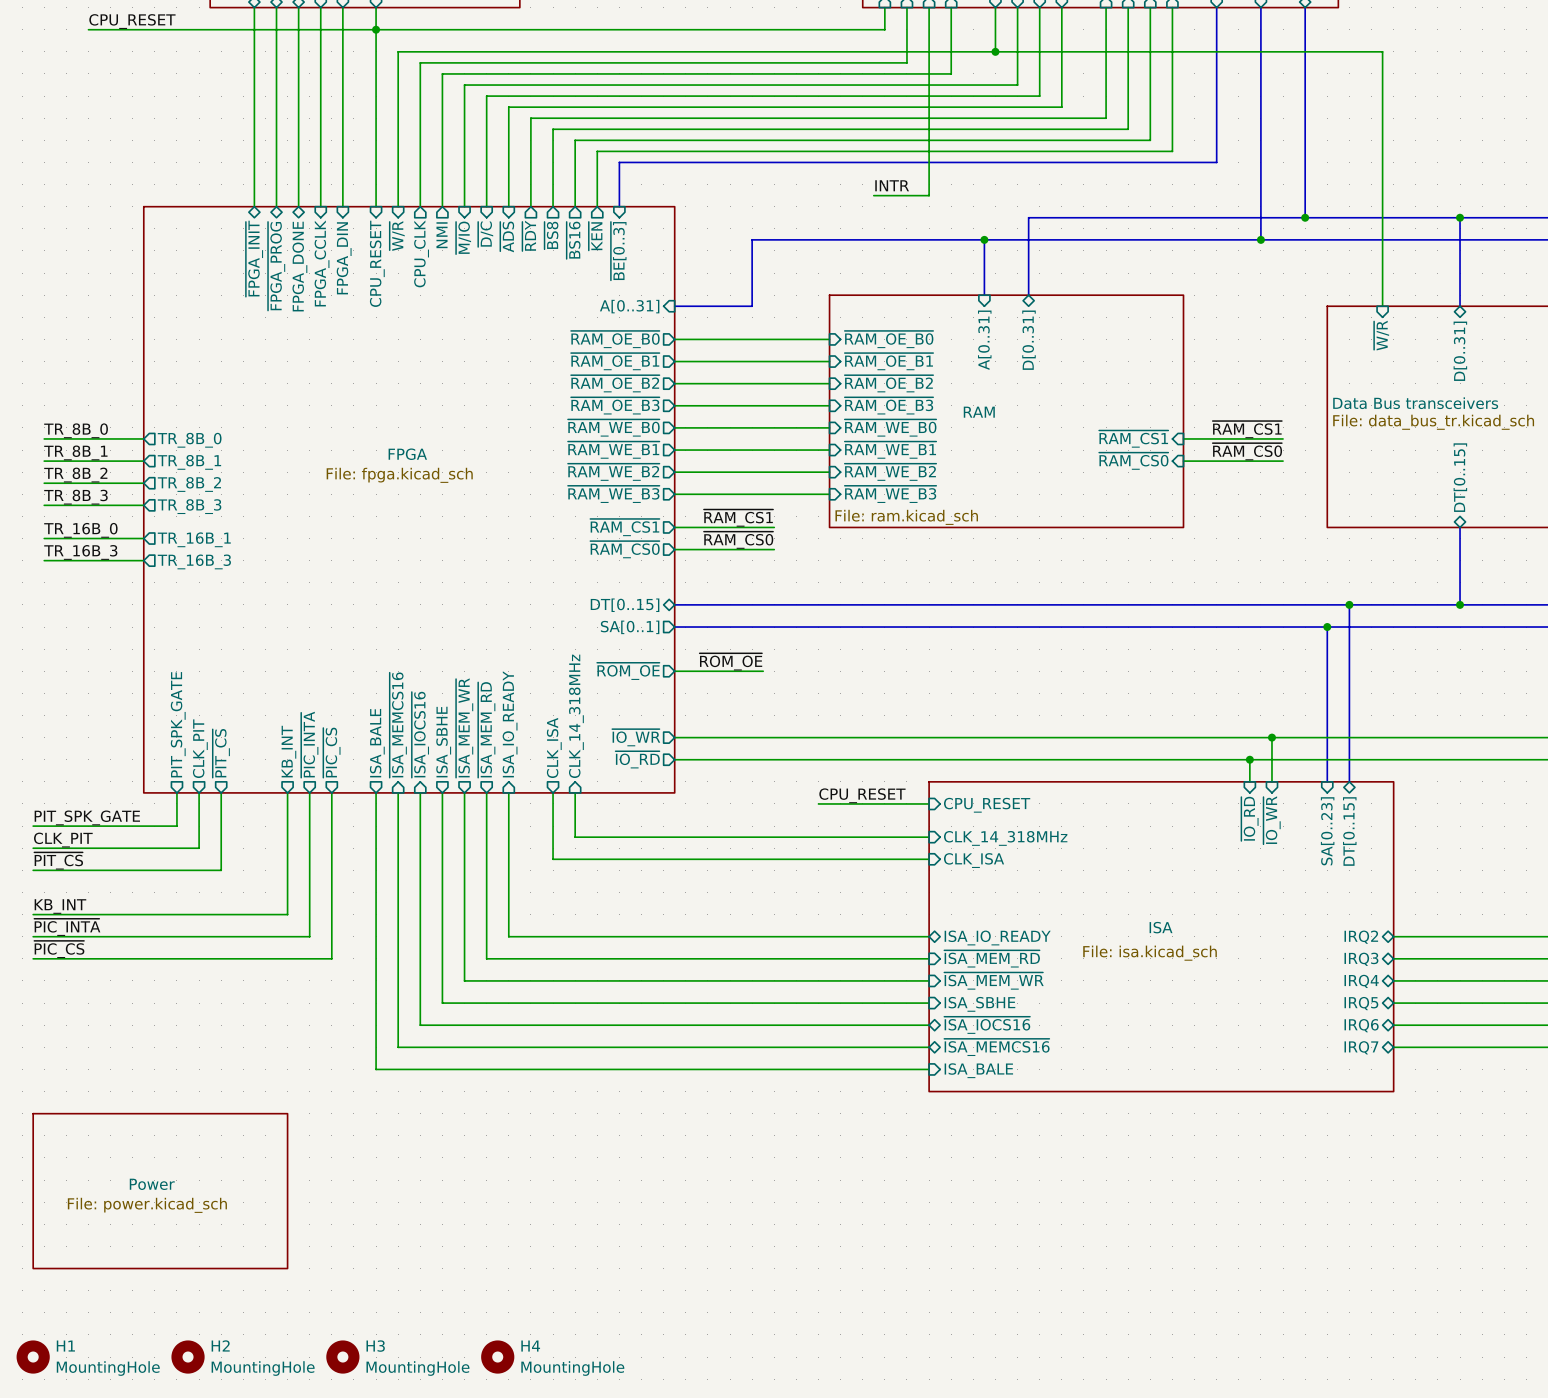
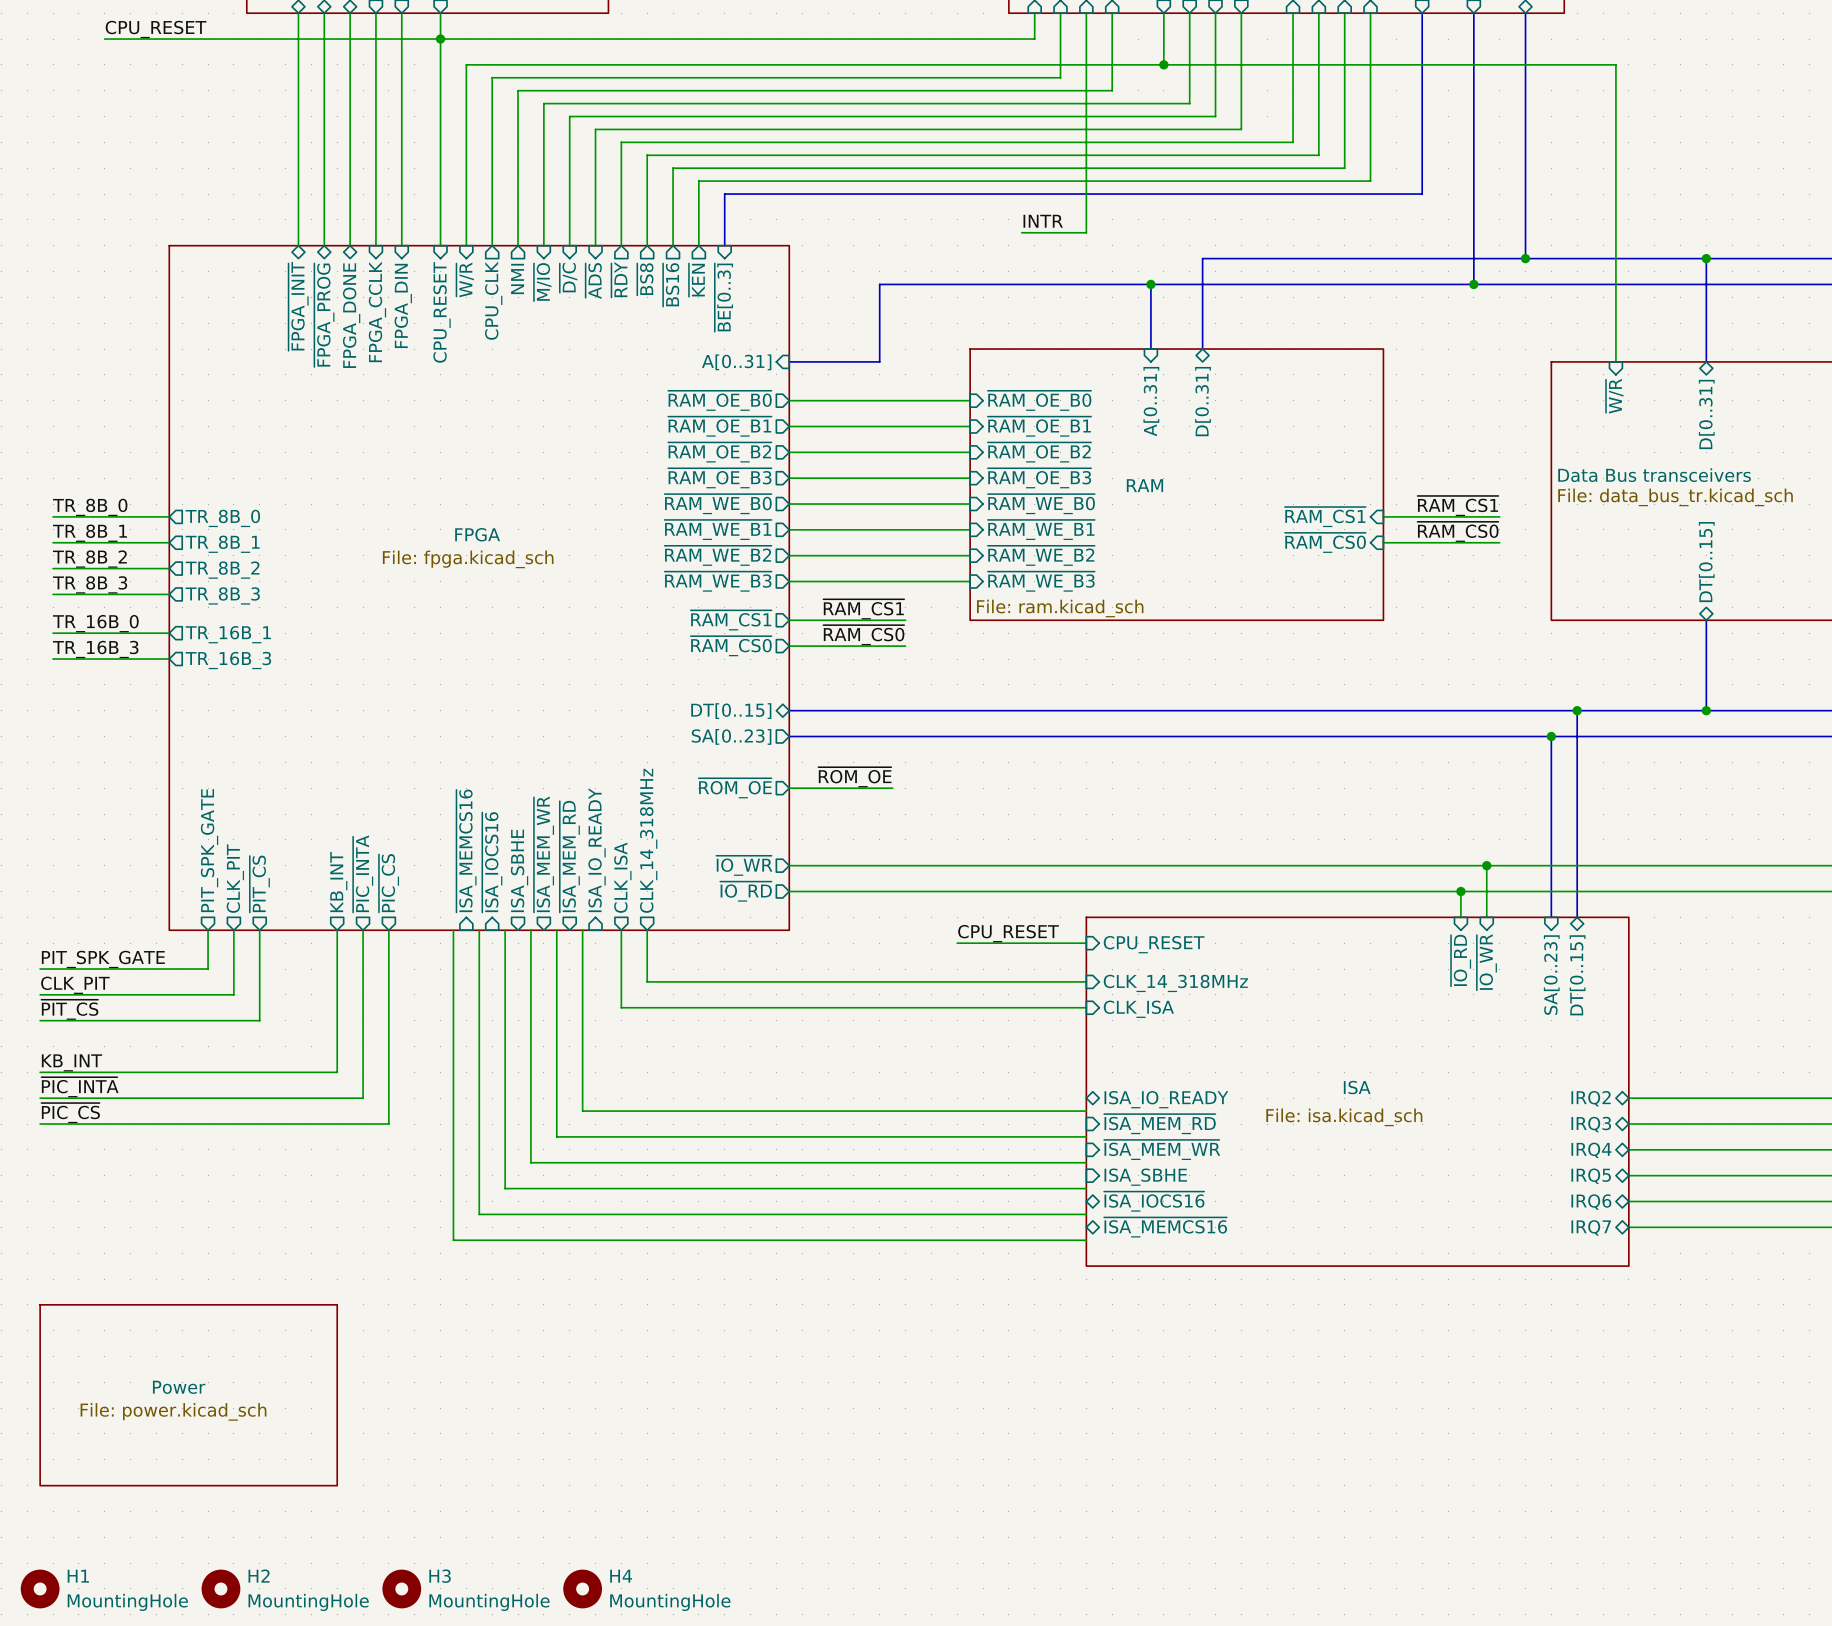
sheet pin: SA[0..1] (630, 627) -> SA[0..23] (731, 736)
sheet pin: CLK_14_318MHz (576, 716) -> none
sheet pin: ISA_BALE (377, 743) -> none
sheet pin: none -> CLK_ISA (622, 877)
sheet pin: CLK_ISA (554, 747) -> CLK_14_318MHz (648, 840)
sheet ISA shape: [928, 781, 1395, 1093] -> [1085, 916, 1630, 1267]
wire: (376, 792) (376, 1069) (929, 1069) -> none
wire: none -> (453, 930) (453, 1240) (1086, 1240)
wire: (398, 792) (398, 1047) (929, 1047) -> none
wire: none -> (479, 930) (479, 1214) (1086, 1214)
wire: (420, 792) (420, 1025) (929, 1025) -> none
wire: none -> (505, 930) (505, 1188) (1086, 1188)
wire: (442, 792) (442, 1003) (929, 1003) -> none
wire: none -> (530, 930) (530, 1162) (1086, 1162)
wire: (464, 792) (464, 980) (929, 980) -> none
wire: none -> (556, 930) (556, 1136) (1086, 1136)
wire: (486, 792) (486, 958) (929, 958) -> none
wire: none -> (582, 930) (582, 1111) (1086, 1111)
wire: (508, 792) (508, 936) (929, 936) -> none
wire: none -> (621, 930) (621, 1007) (647, 1007)
wire: (575, 792) (575, 837) -> none
wire: (553, 837) (553, 859) -> (647, 981) (673, 981)
sheet pin: ISA_BALE (978, 1070) -> none

